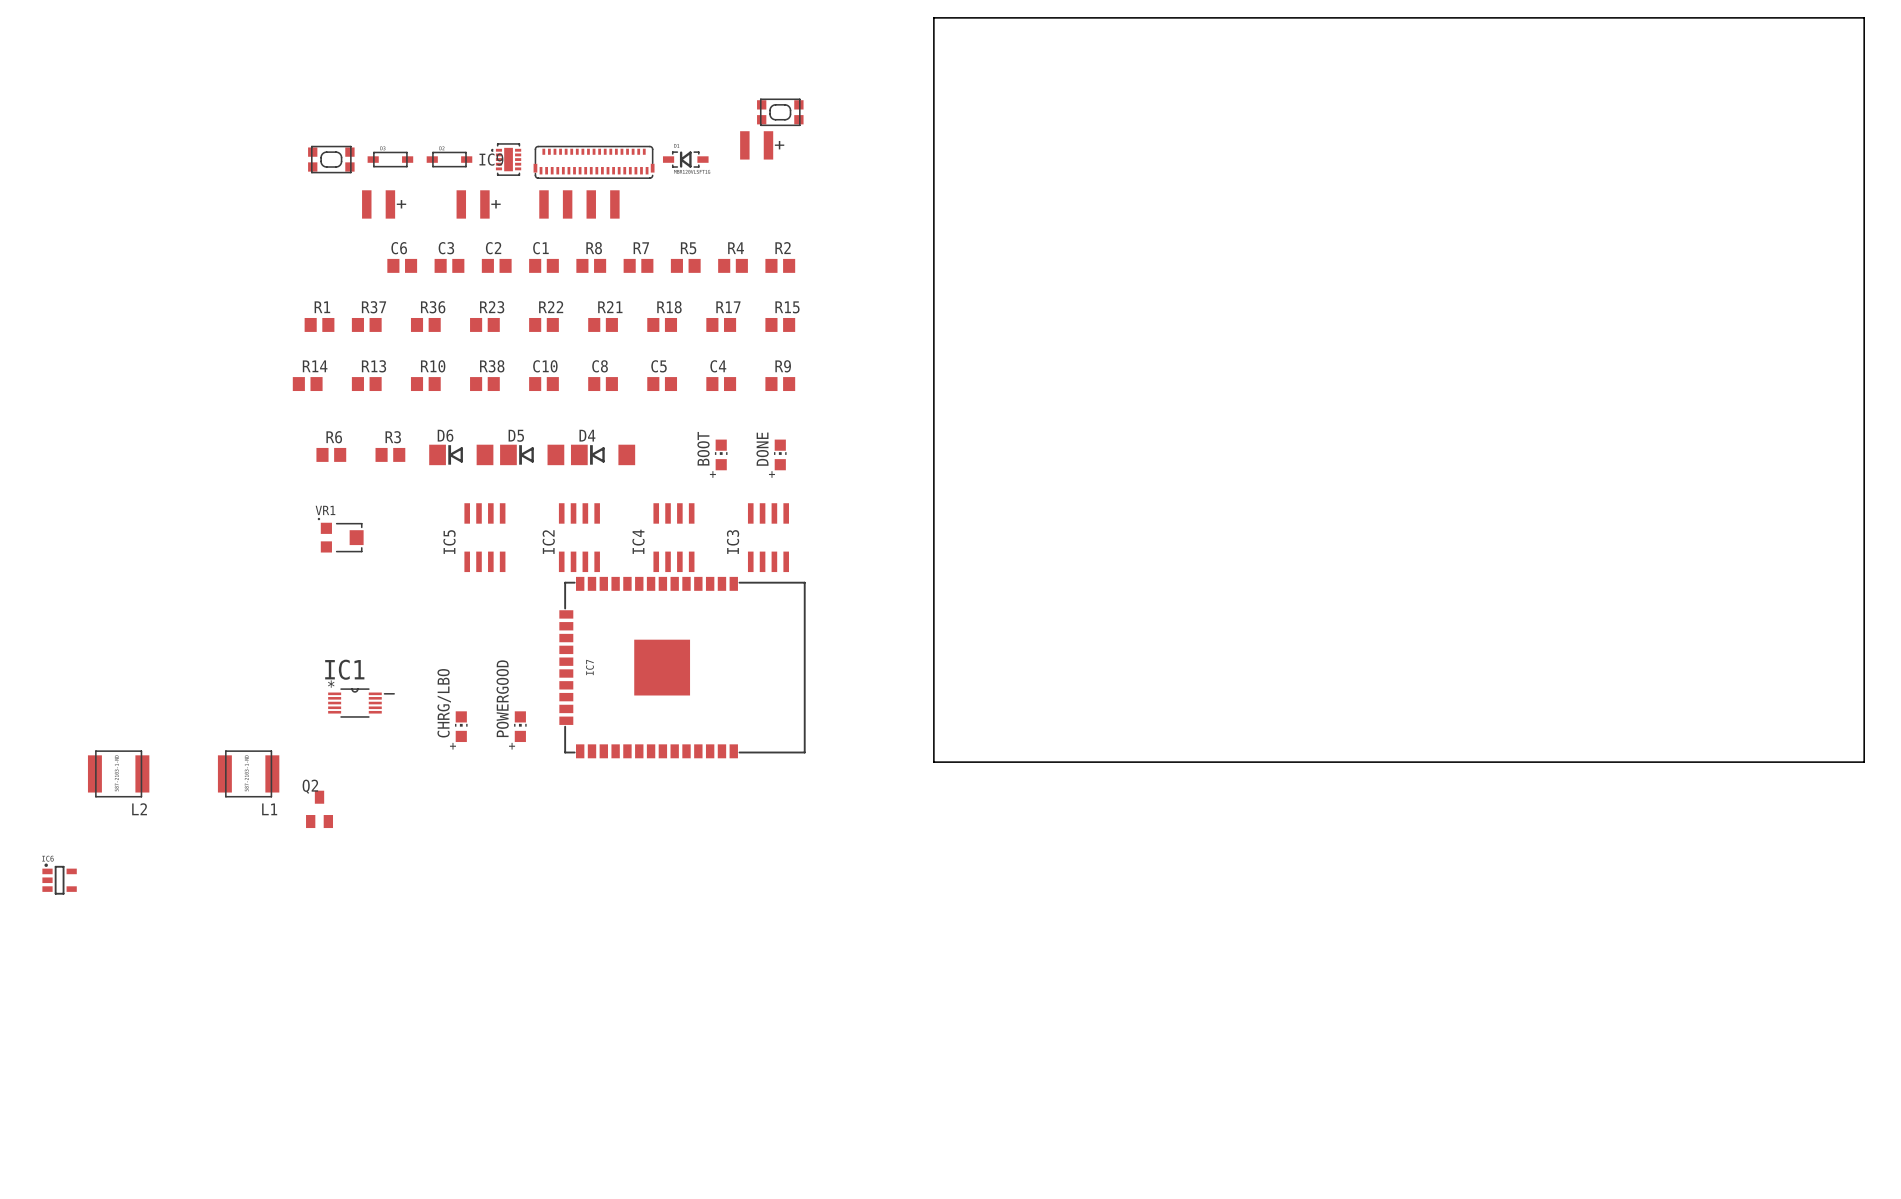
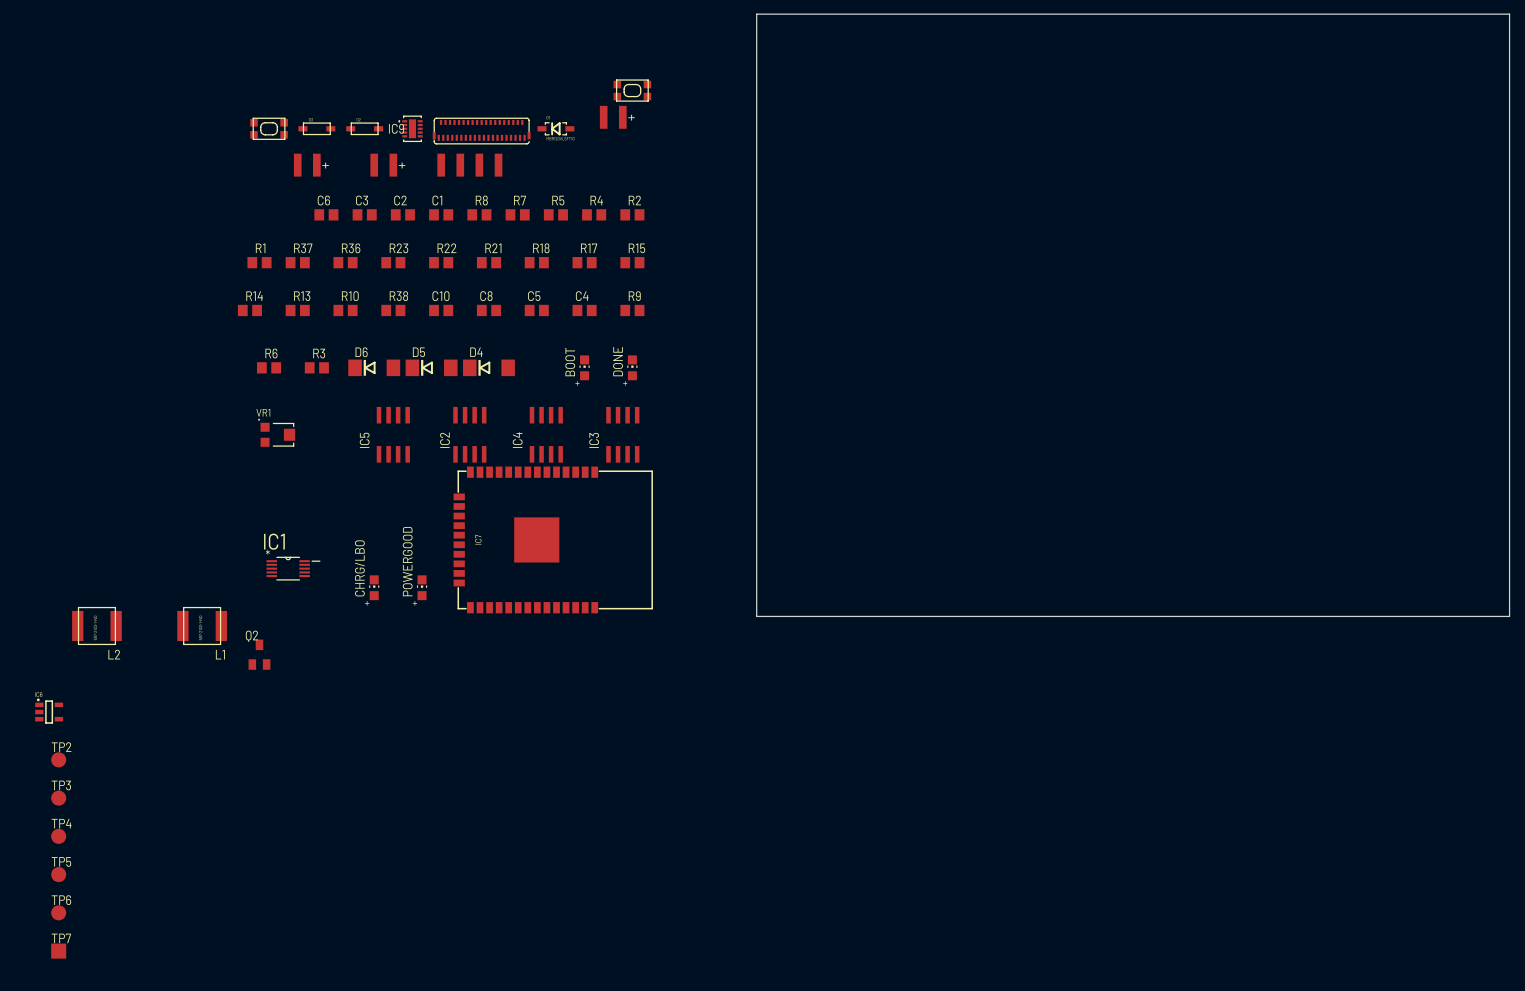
TP2: none -> (58, 759)
TP3: none -> (58, 798)
TP4: none -> (58, 836)
TP5: none -> (58, 874)
TP6: none -> (58, 912)
TP7: none -> (58, 951)

